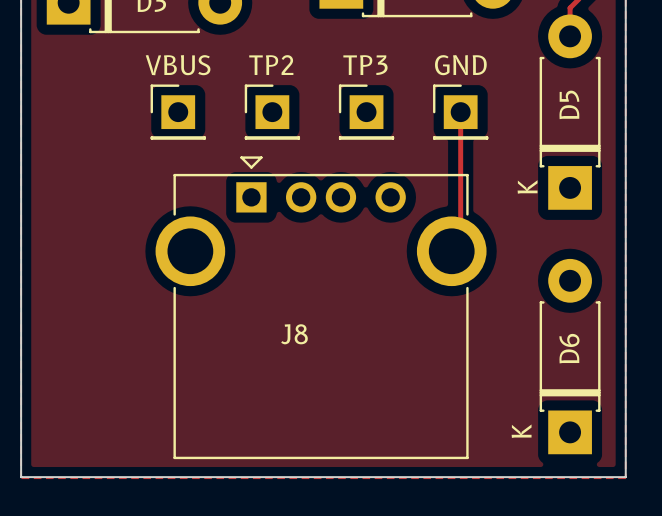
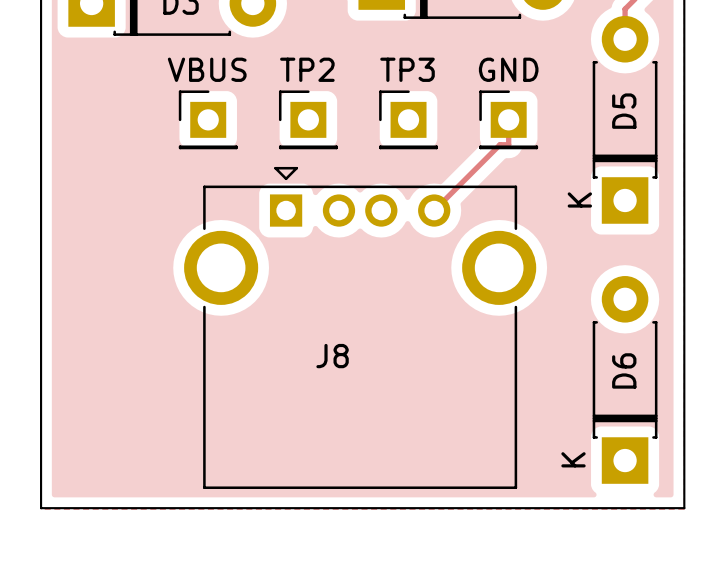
track: (460, 135) (460, 242) (451, 251) -> (508, 144) (500, 144) (434, 210)

